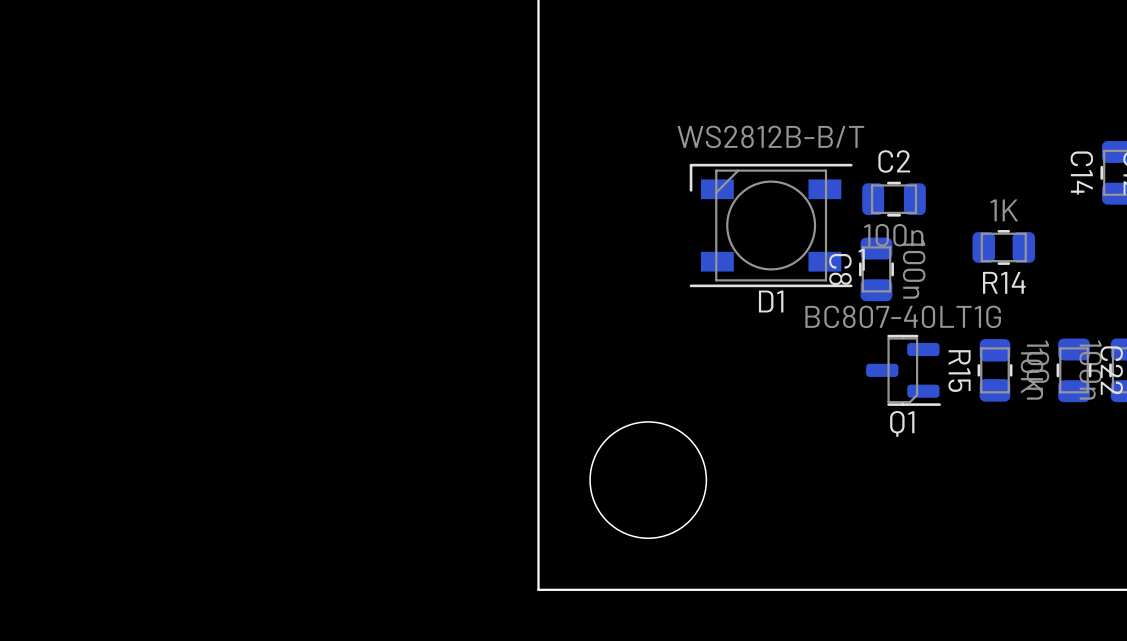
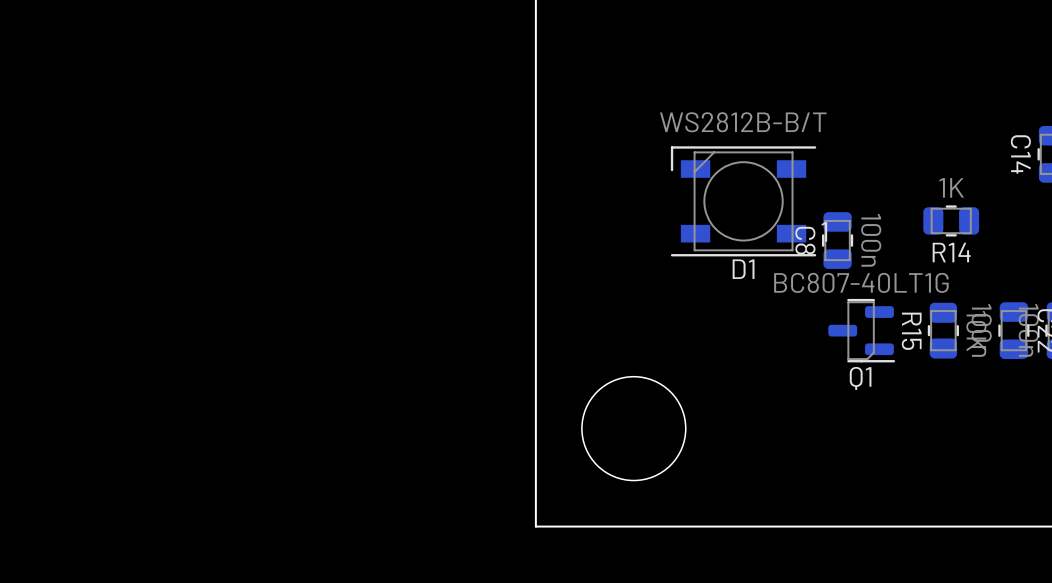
C2: 100n (894, 199) -> none

